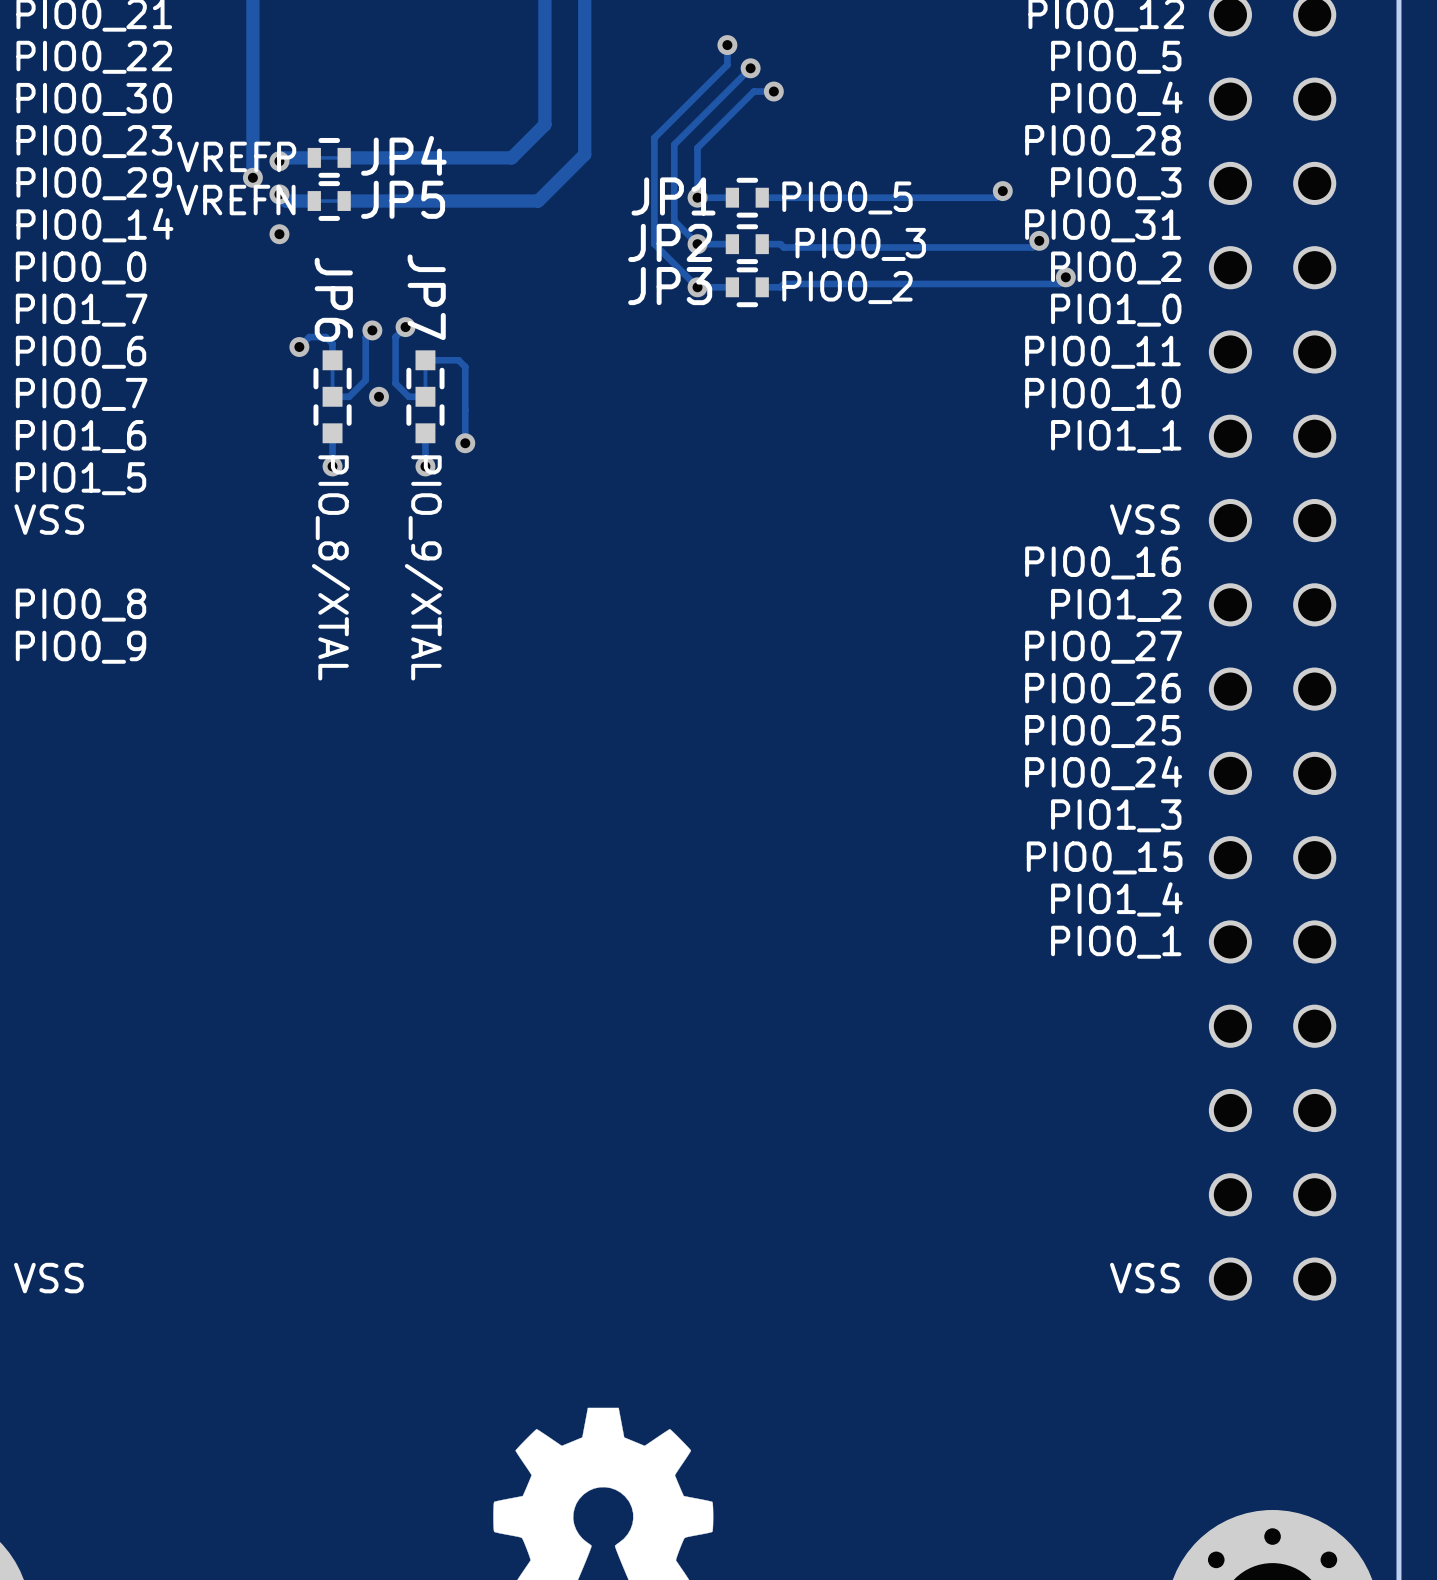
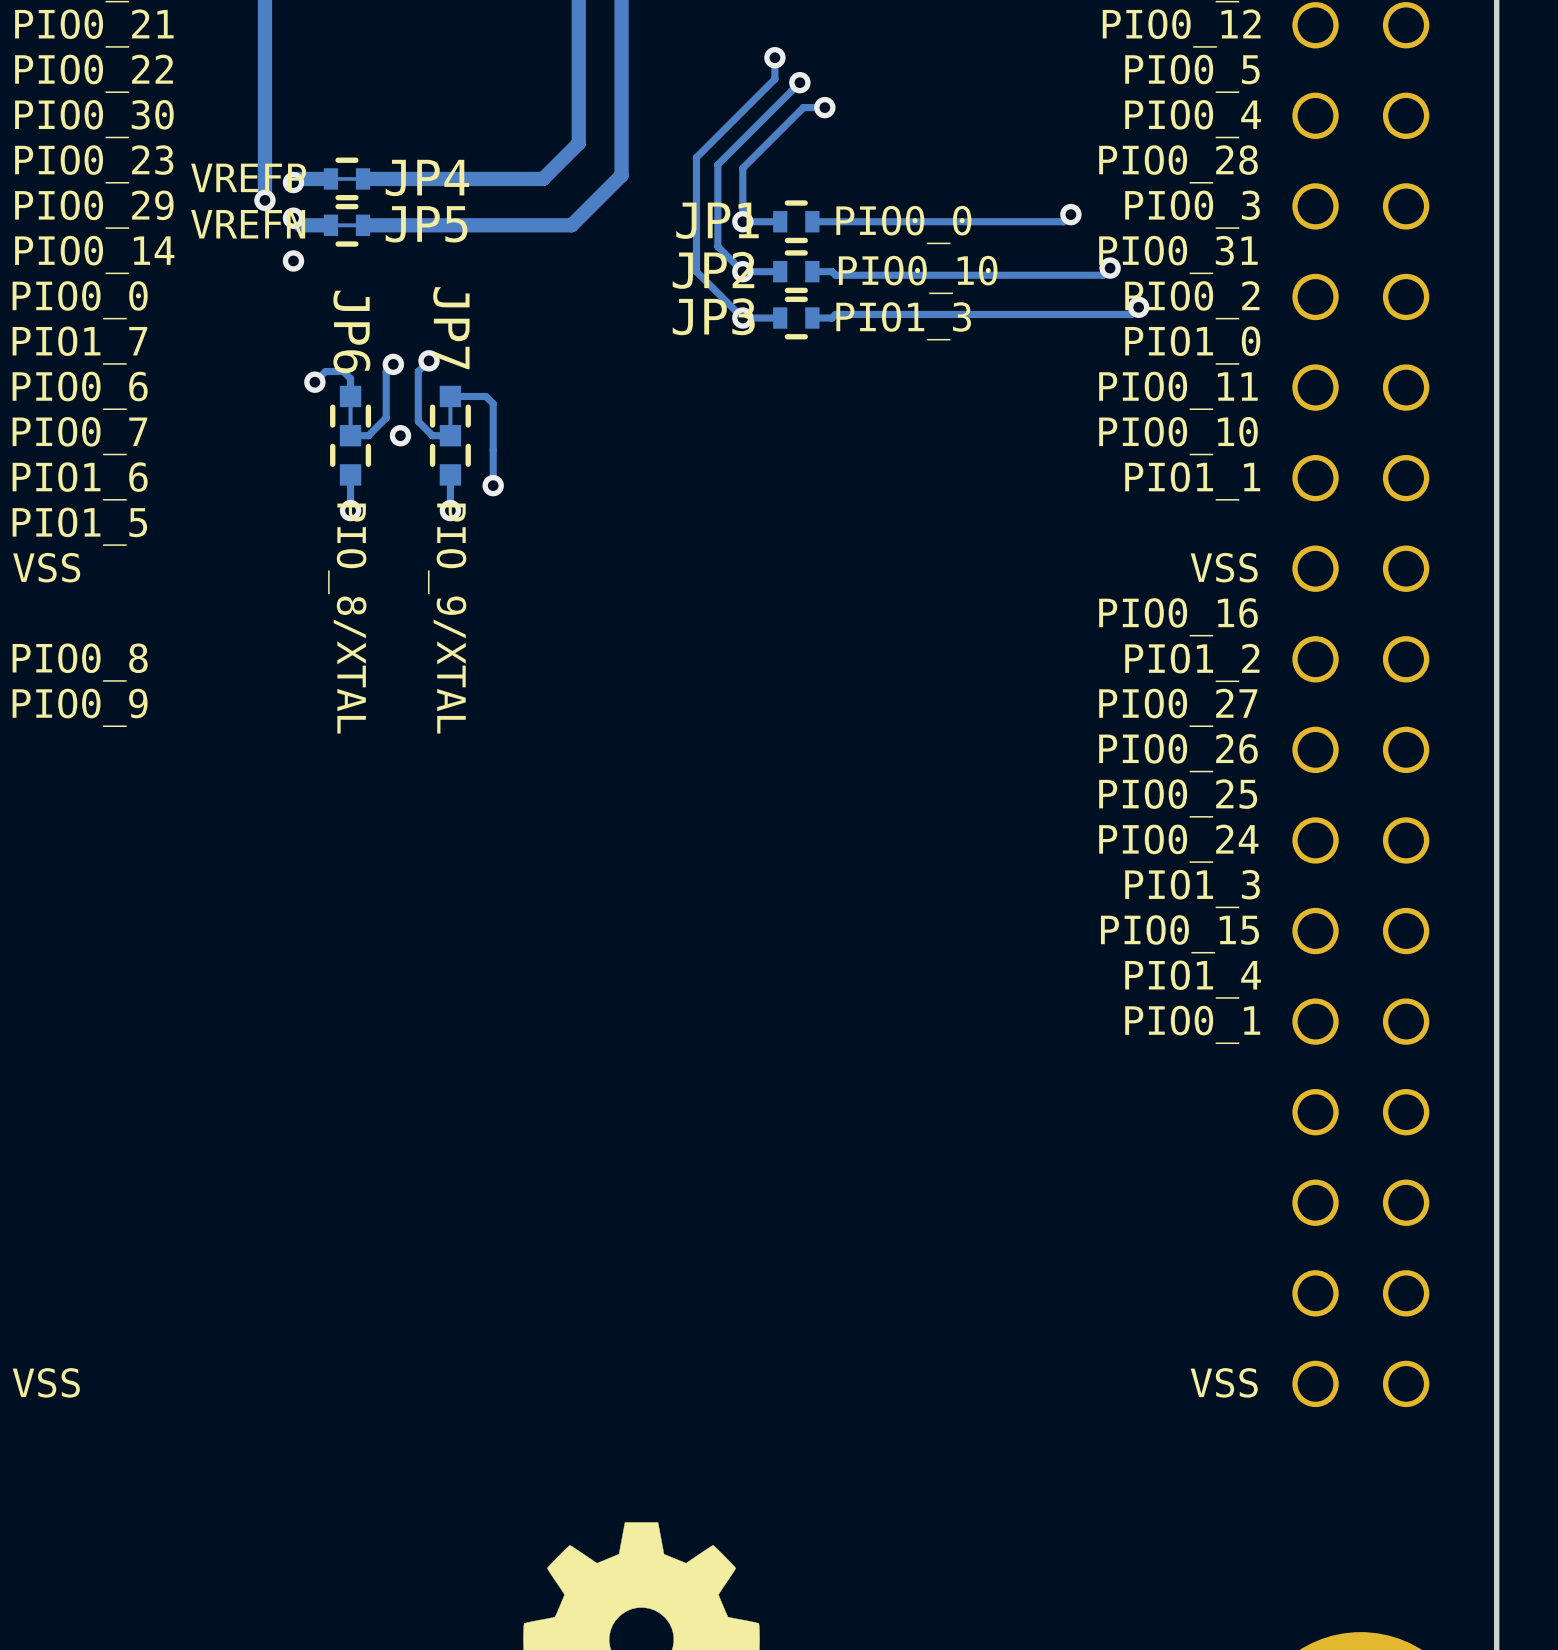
JP1 value: PIO0_5 (847, 197) -> PIO0_0 (903, 225)
JP2 value: PIO0_3 (860, 244) -> PIO0_10 (918, 274)
JP3 value: PIO0_2 (847, 287) -> PIO1_3 (903, 321)

